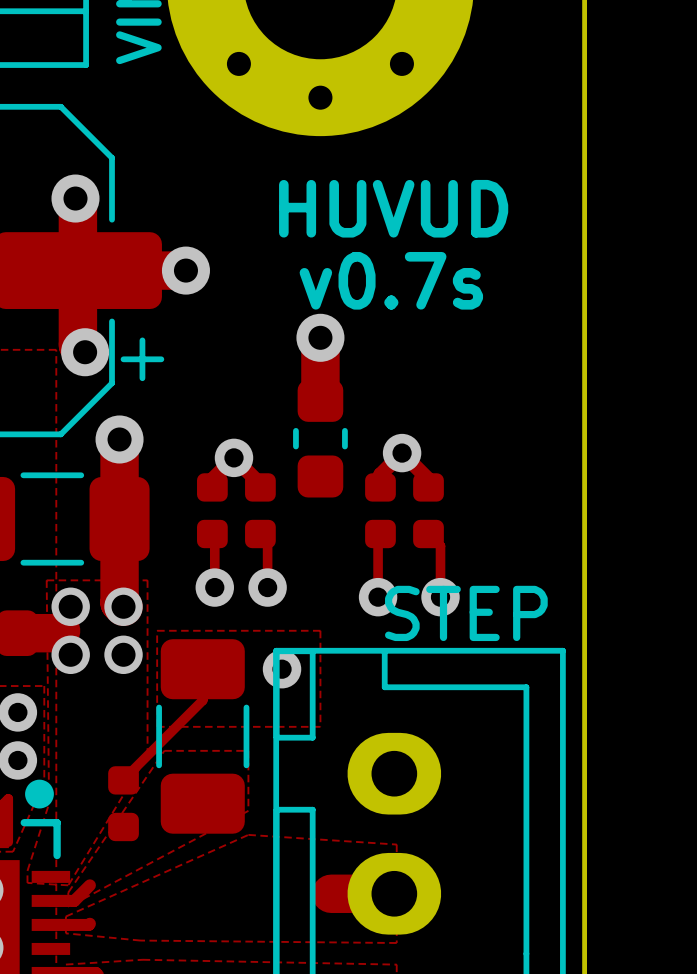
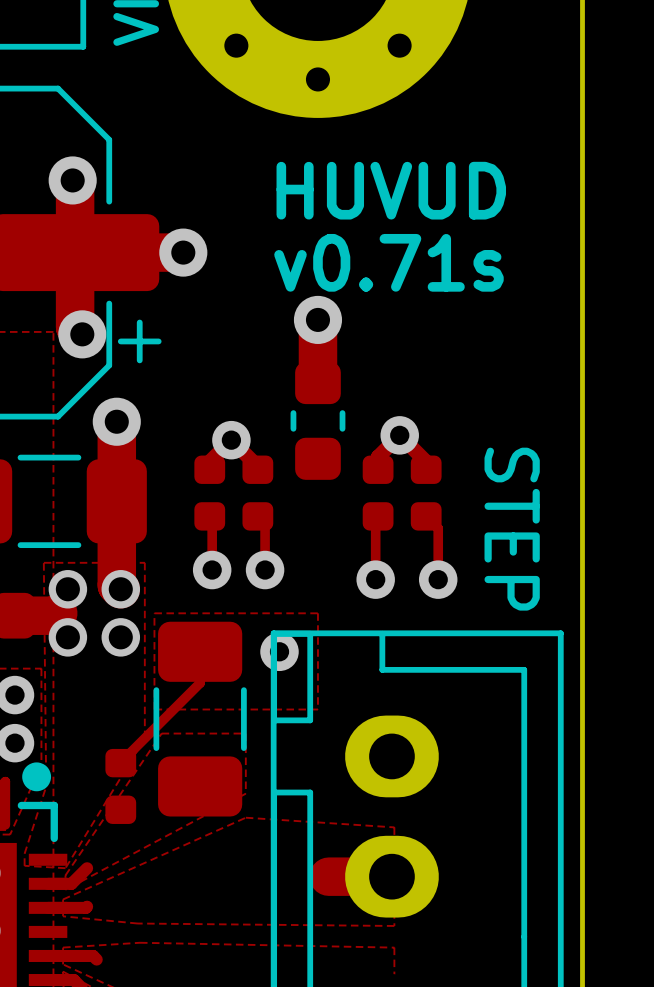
text: v0.7s (391, 280) -> v0.71s (388, 262)
text rotation: 0° (466, 613) -> 90° clockwise (512, 529)

